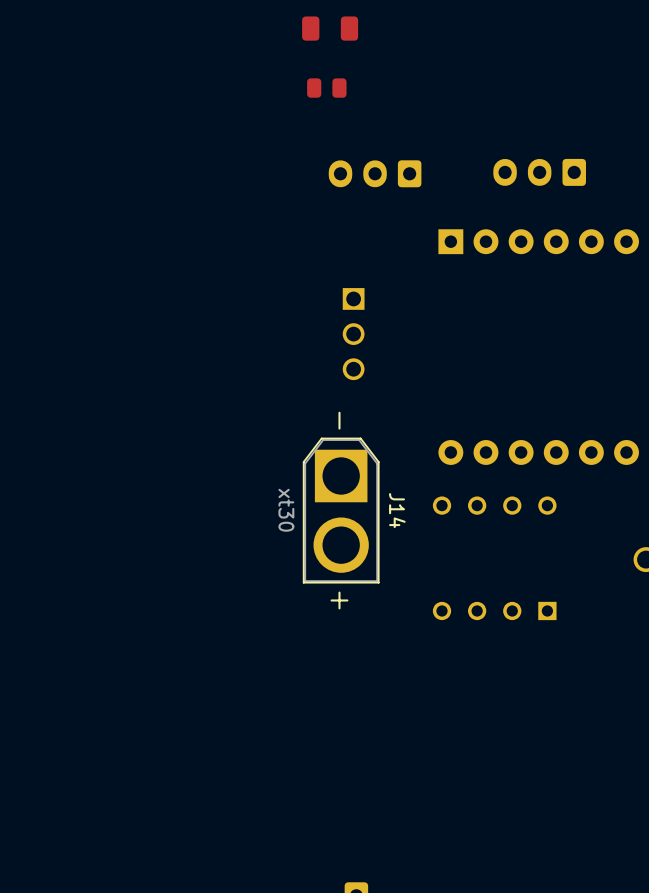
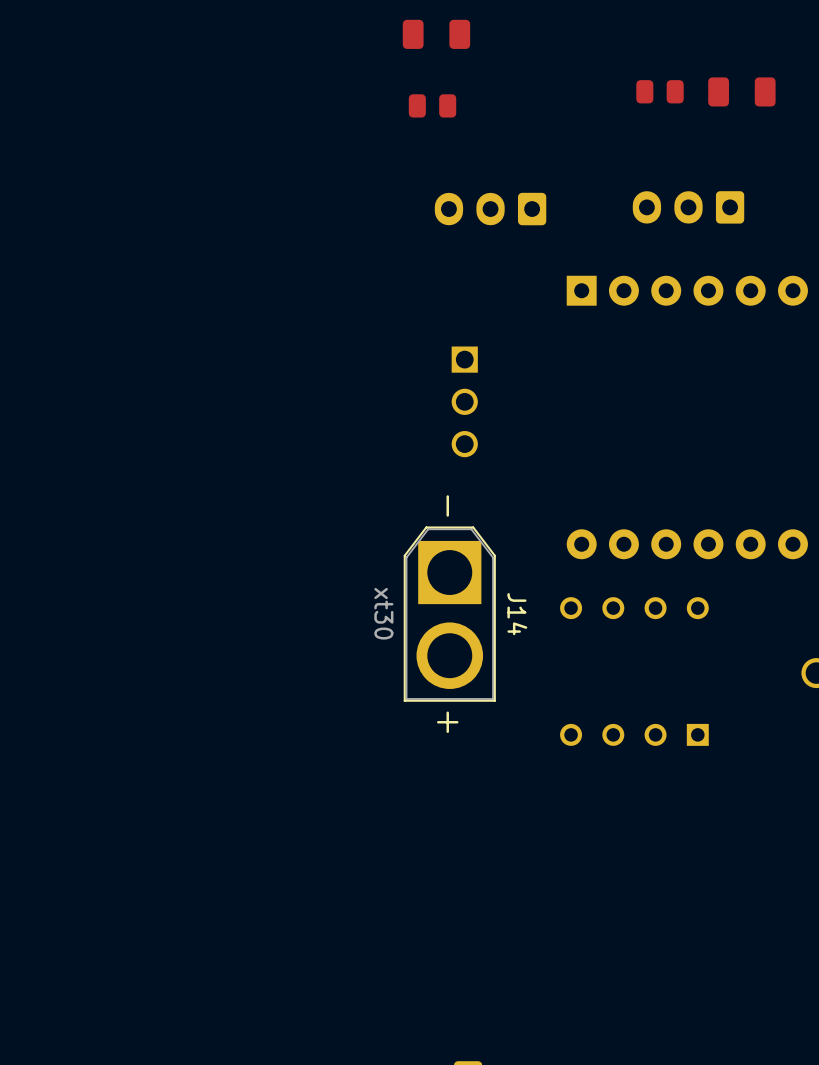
part: none -> (660, 91)
part: none -> (741, 91)

